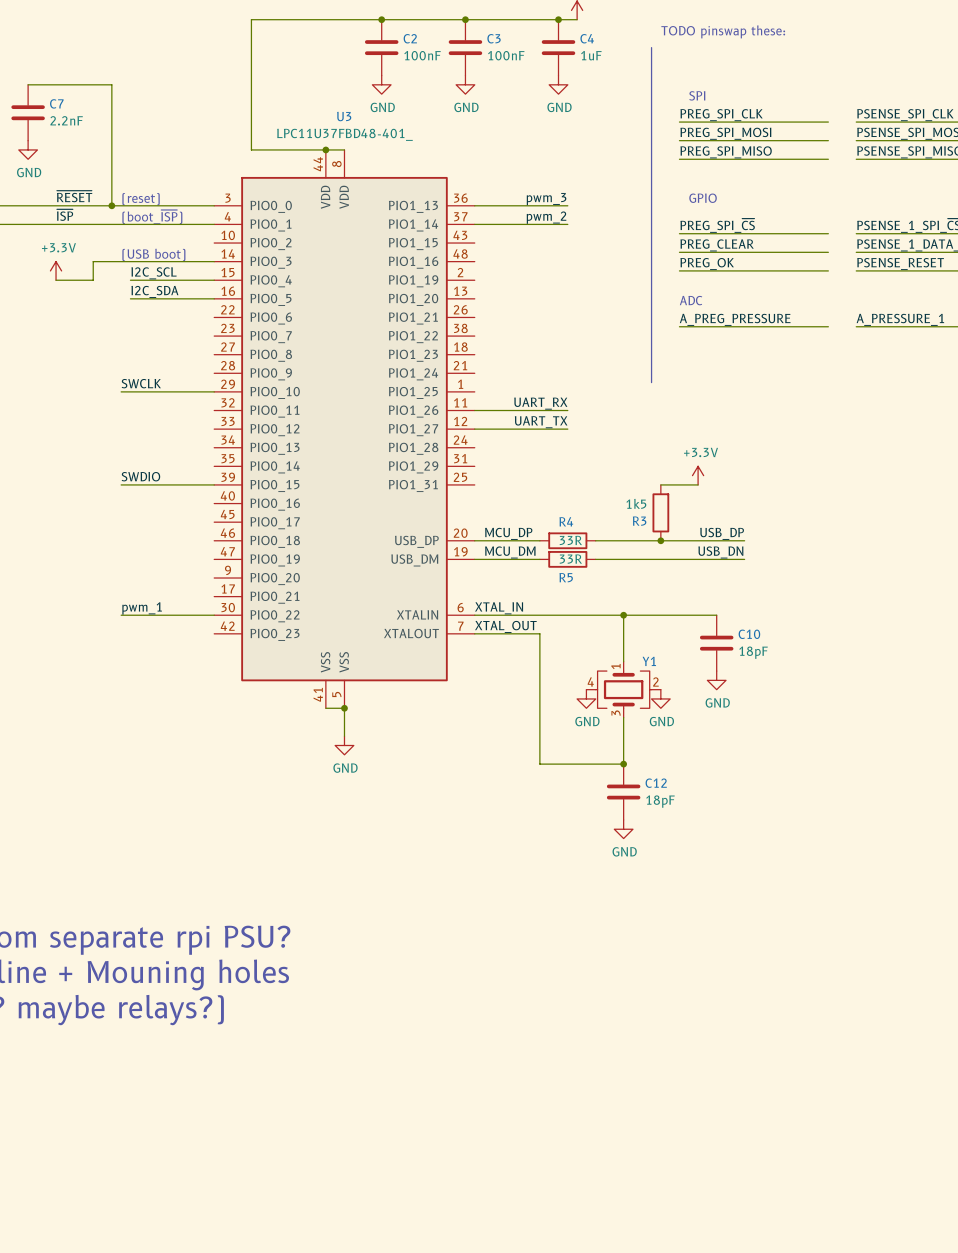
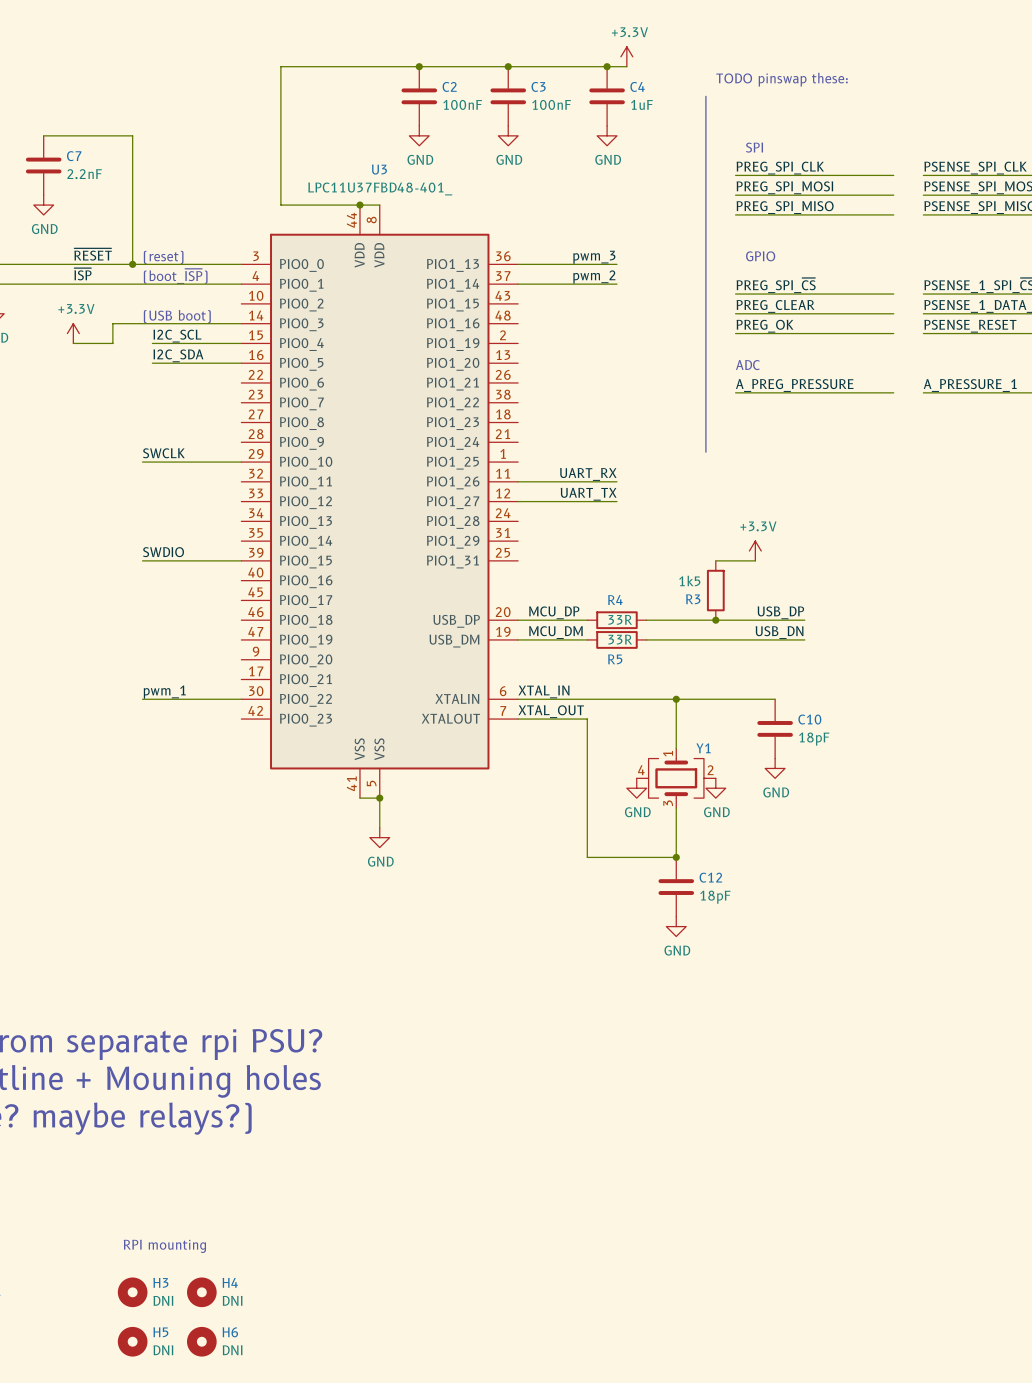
text: none -> RPI mounting (164, 1246)
H3: none -> DNI (132, 1292)
H4: none -> DNI (201, 1292)
H5: none -> DNI (132, 1341)
H6: none -> DNI (201, 1341)

